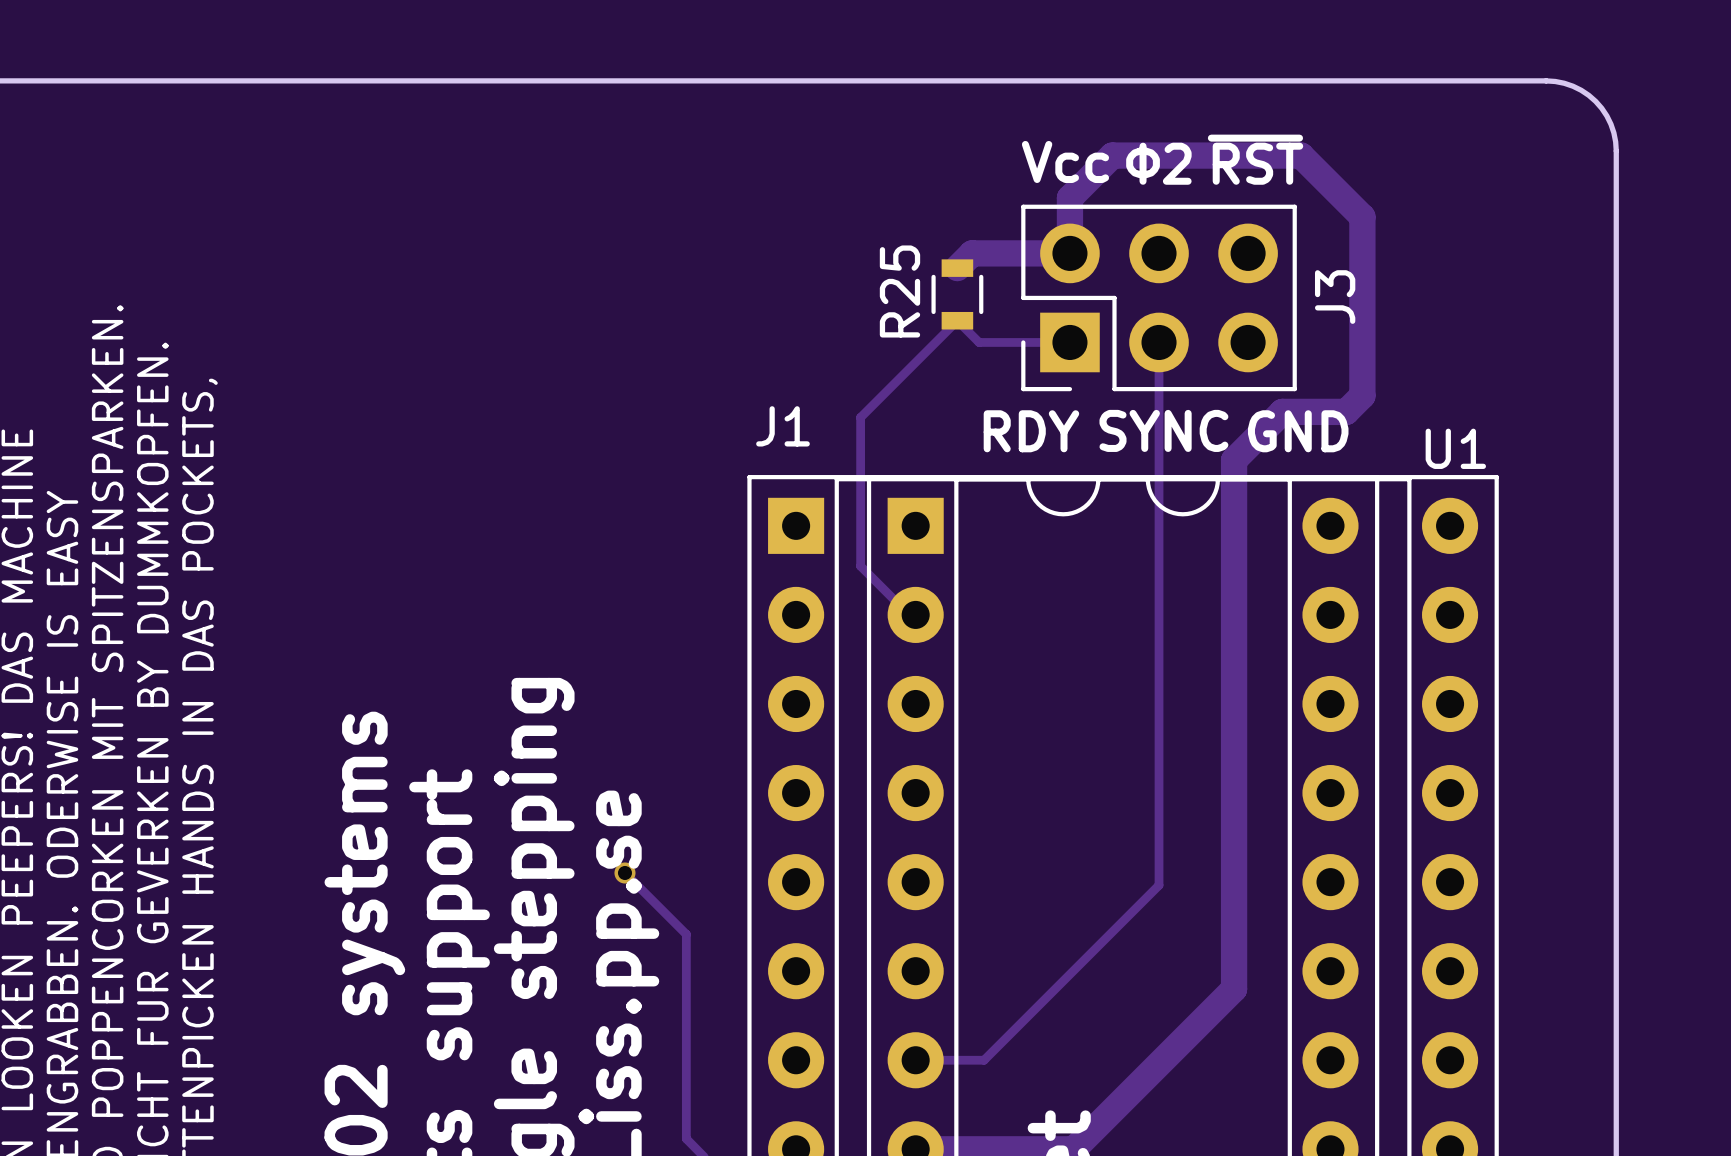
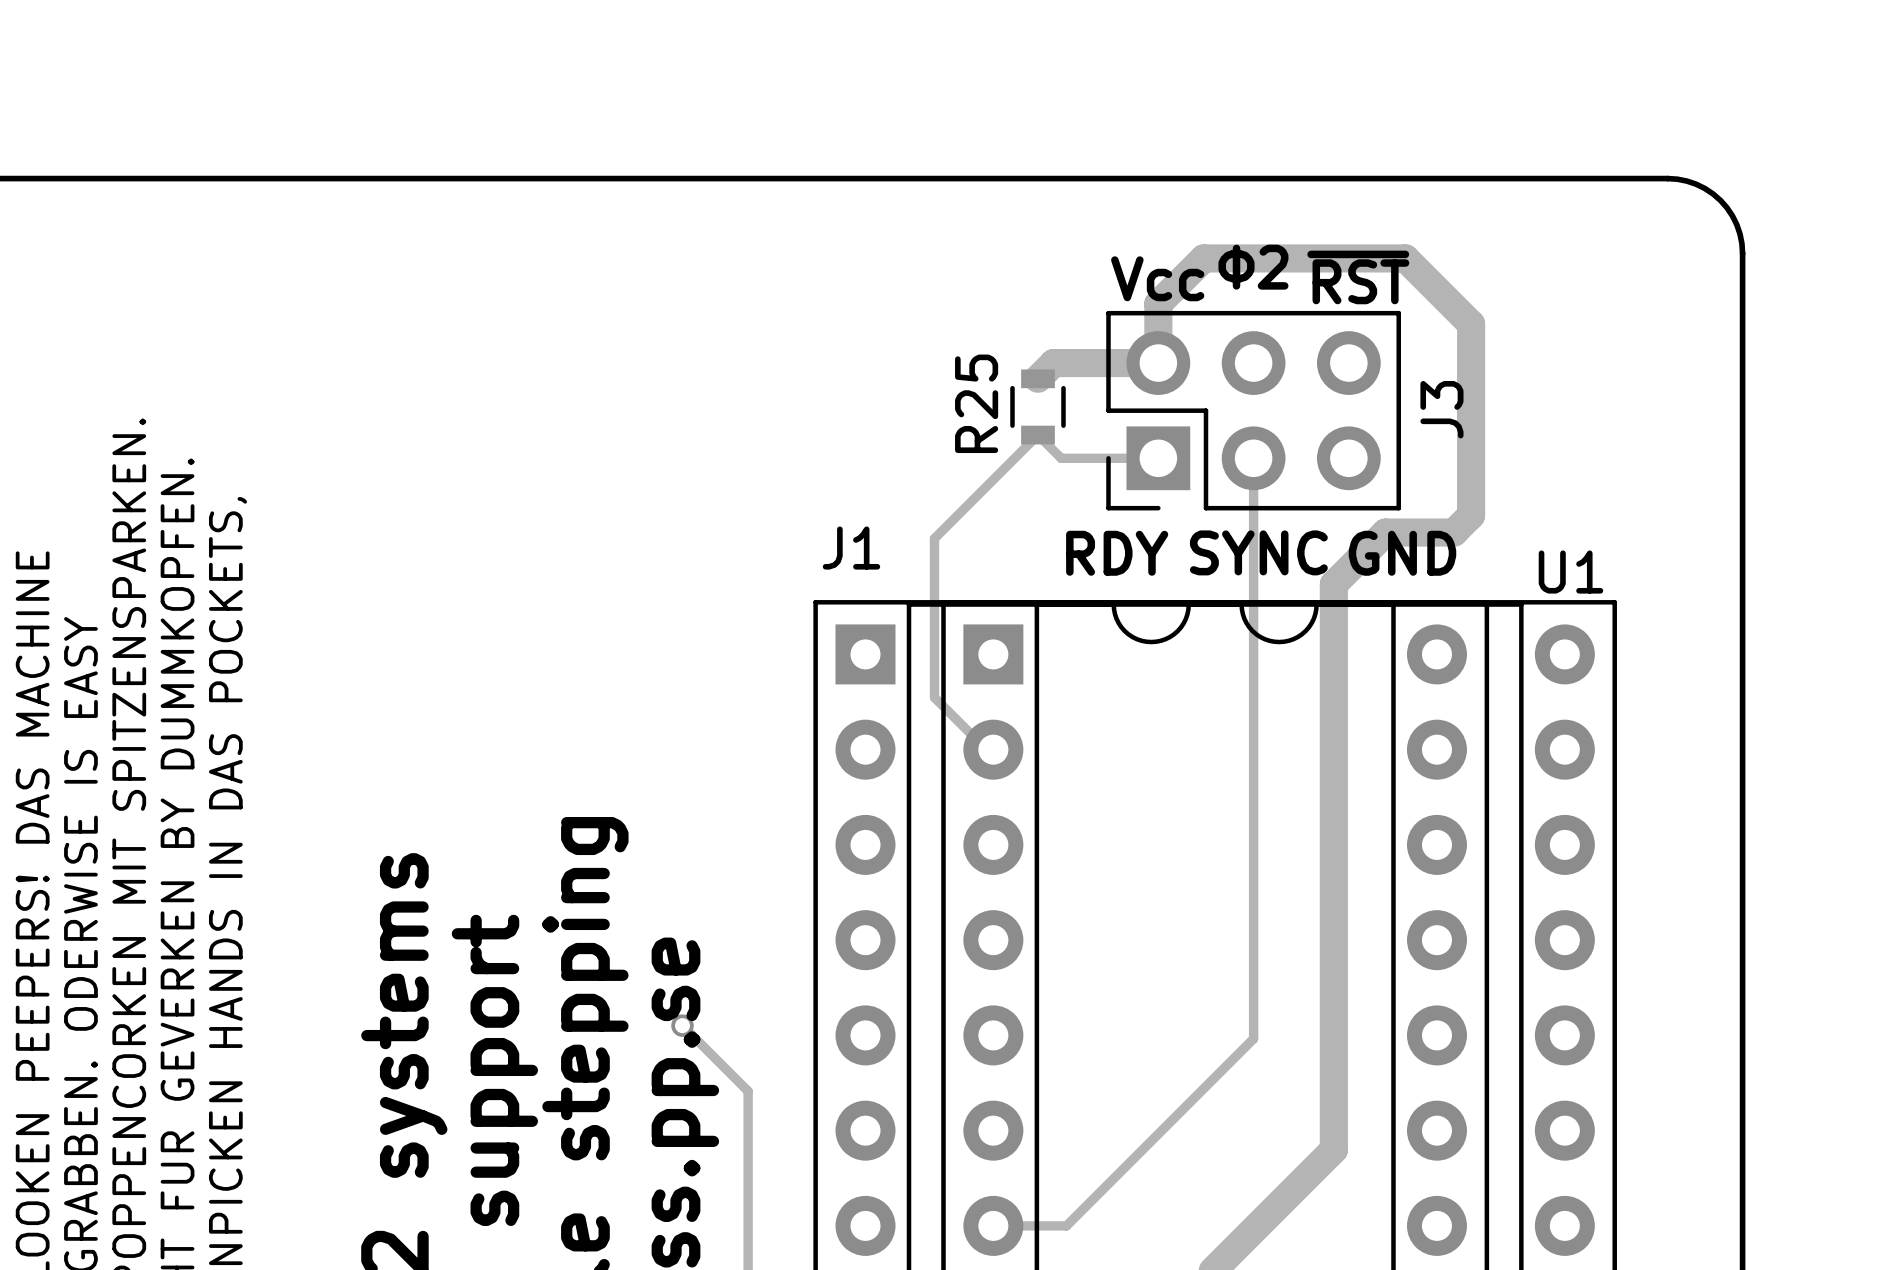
text position: ~{RST} (1255, 159) -> ~{RST} (1358, 277)
text position: Vcc (1065, 161) -> Vcc (1157, 278)

